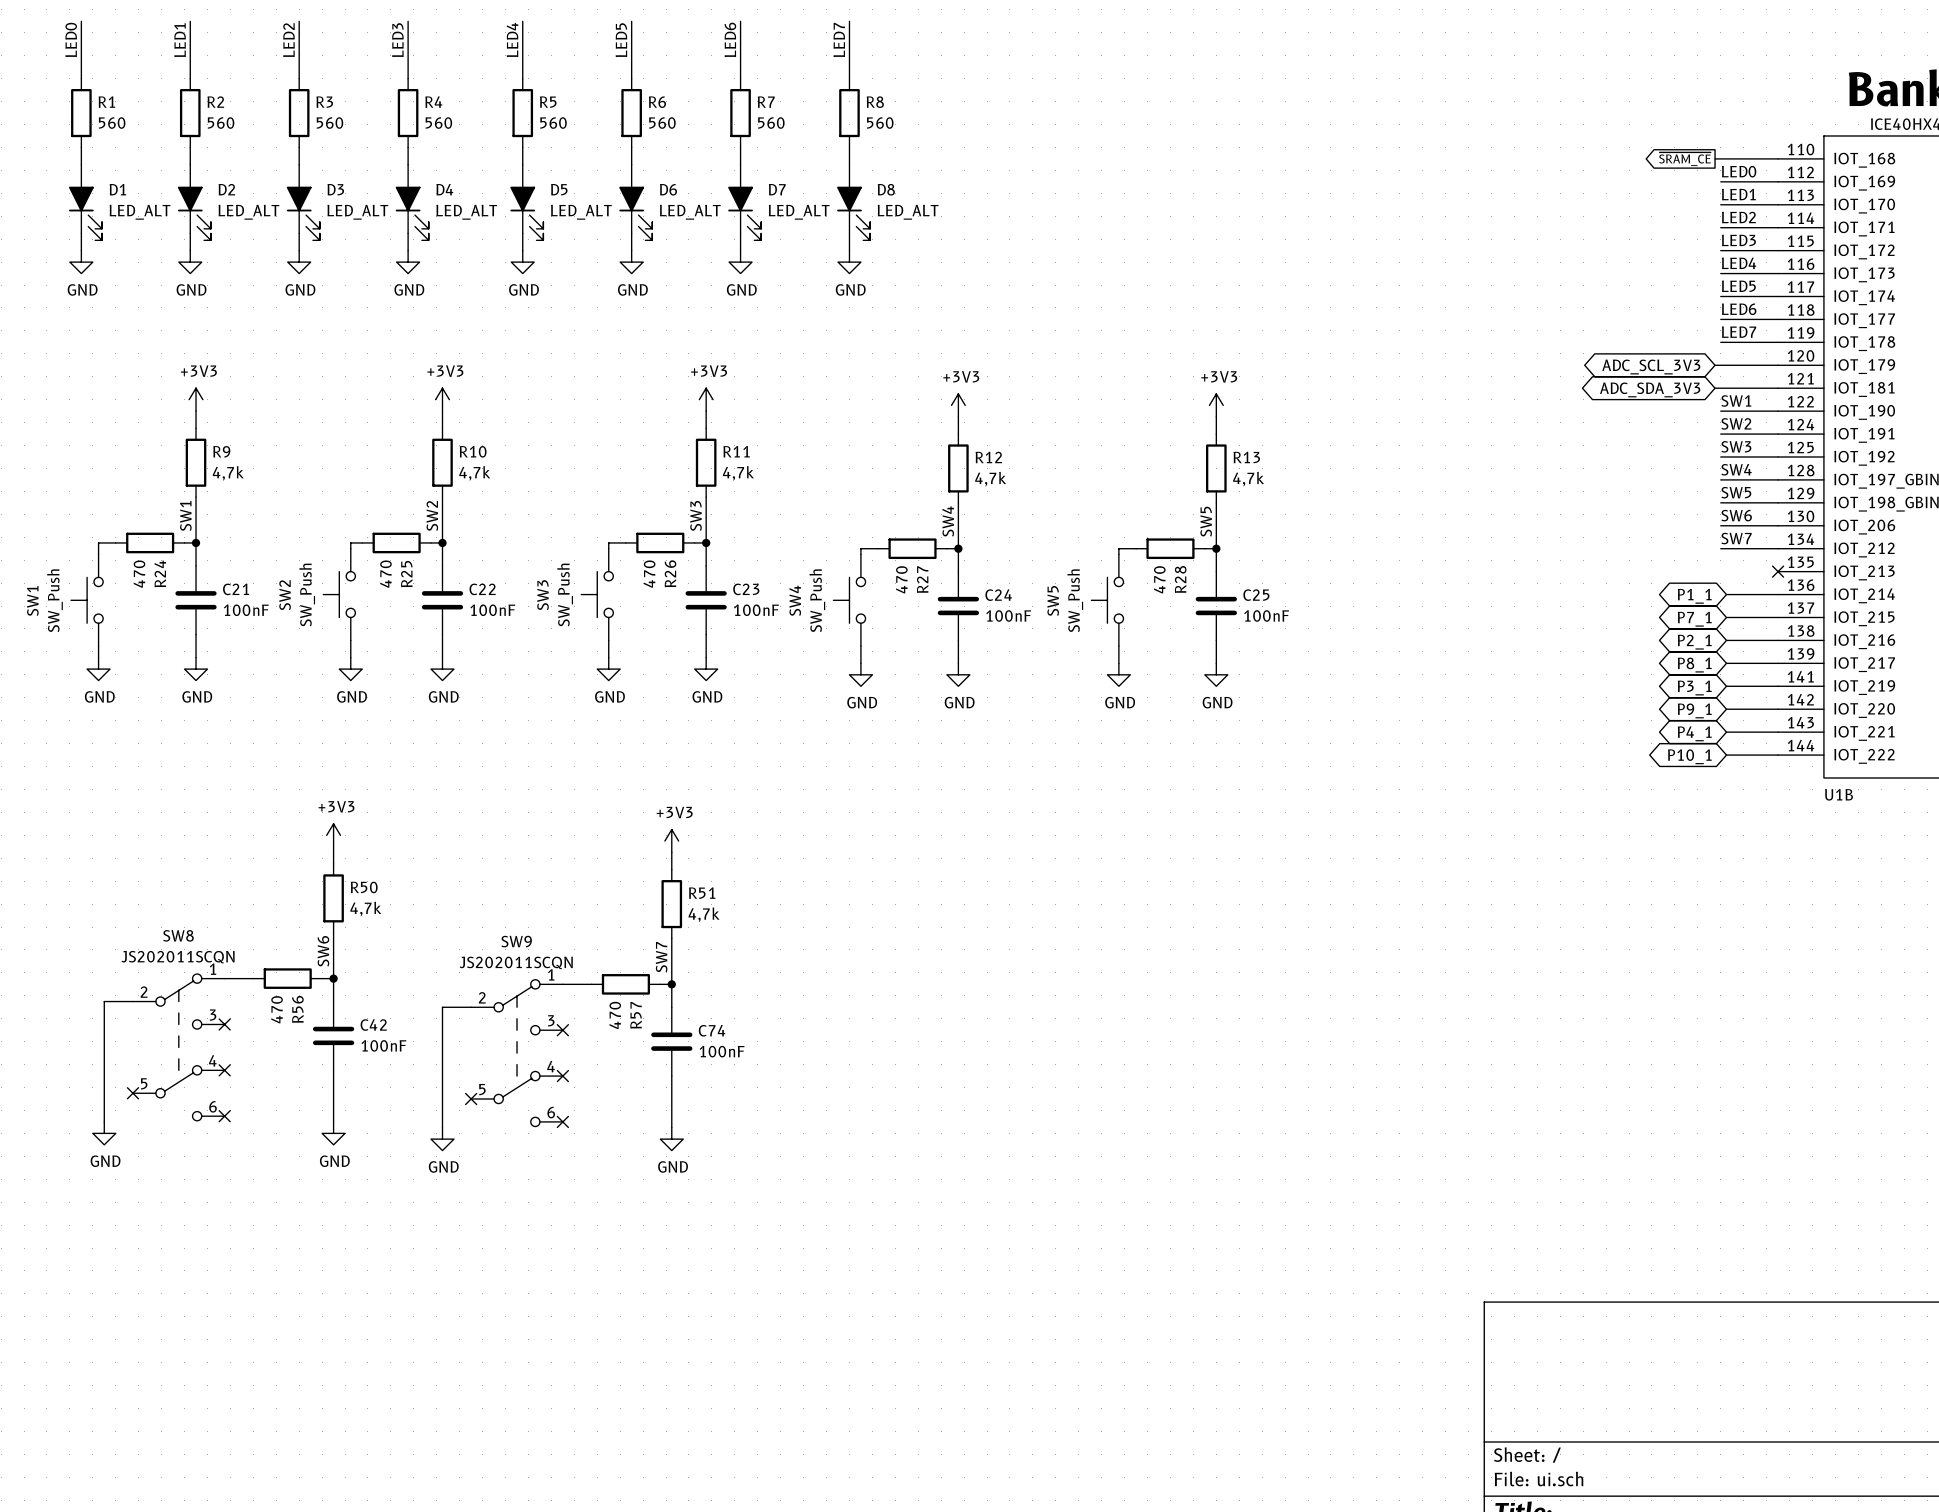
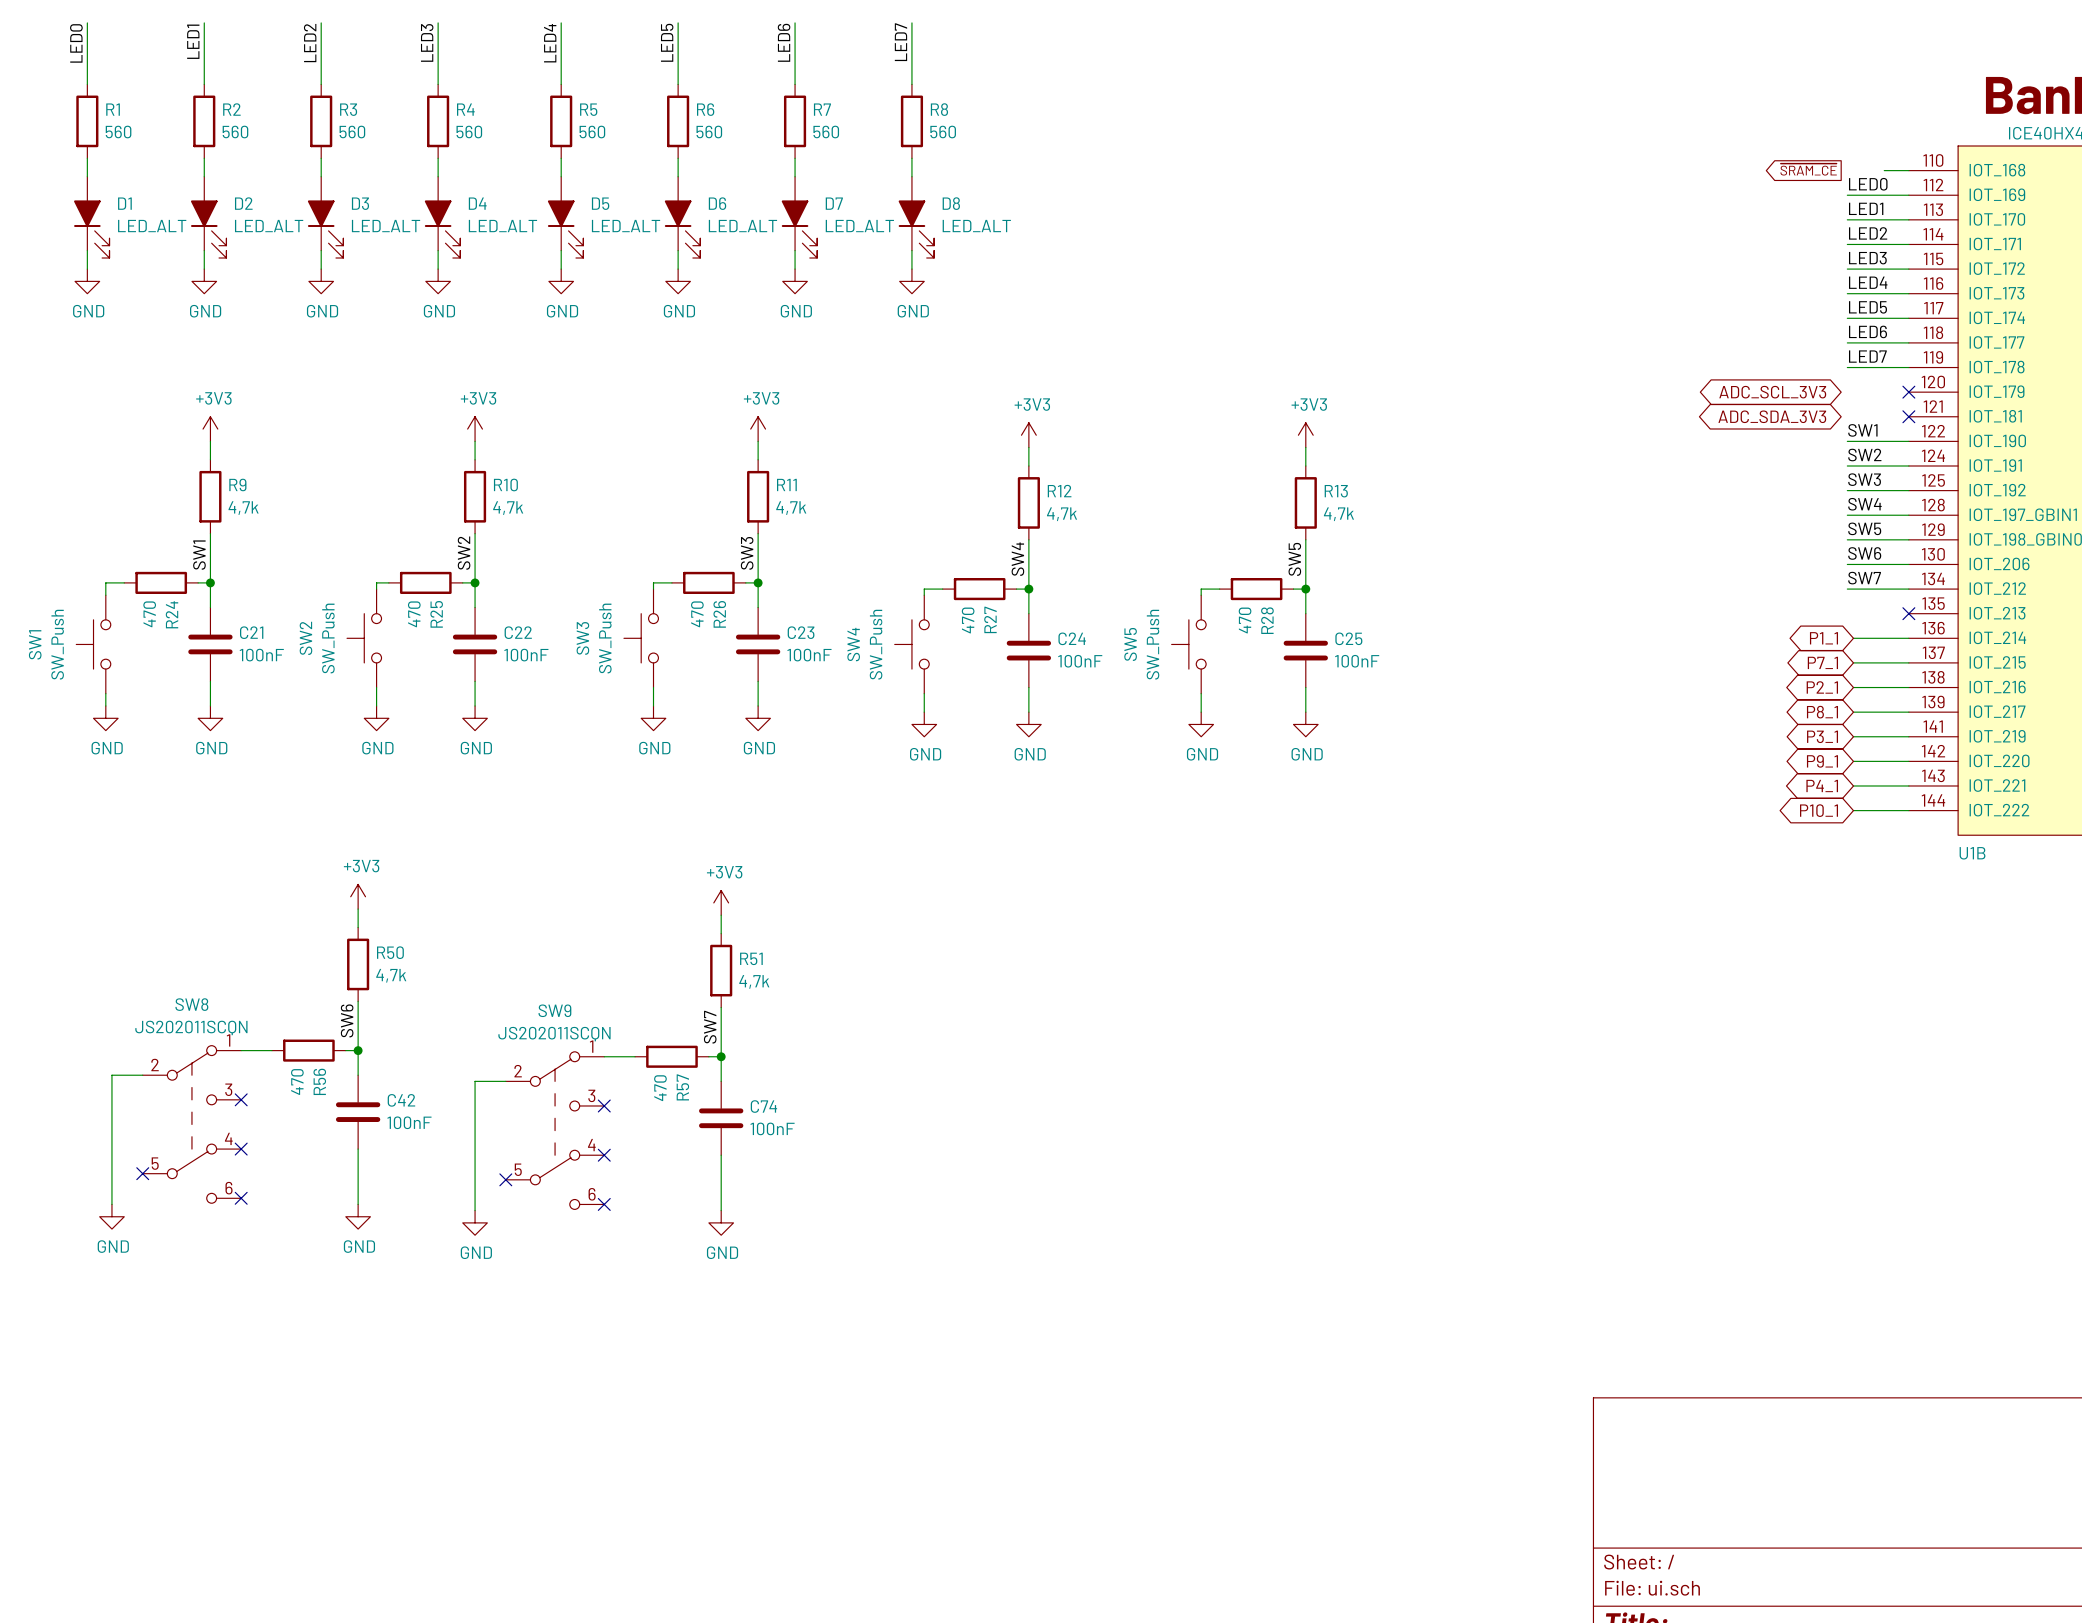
wire: (1715, 158) (1755, 158) -> none
wire: (1715, 365) (1778, 365) -> none
no-connect mark: none -> (1908, 392)
wire: (1715, 388) (1778, 388) -> none
no-connect mark: none -> (1908, 416)

